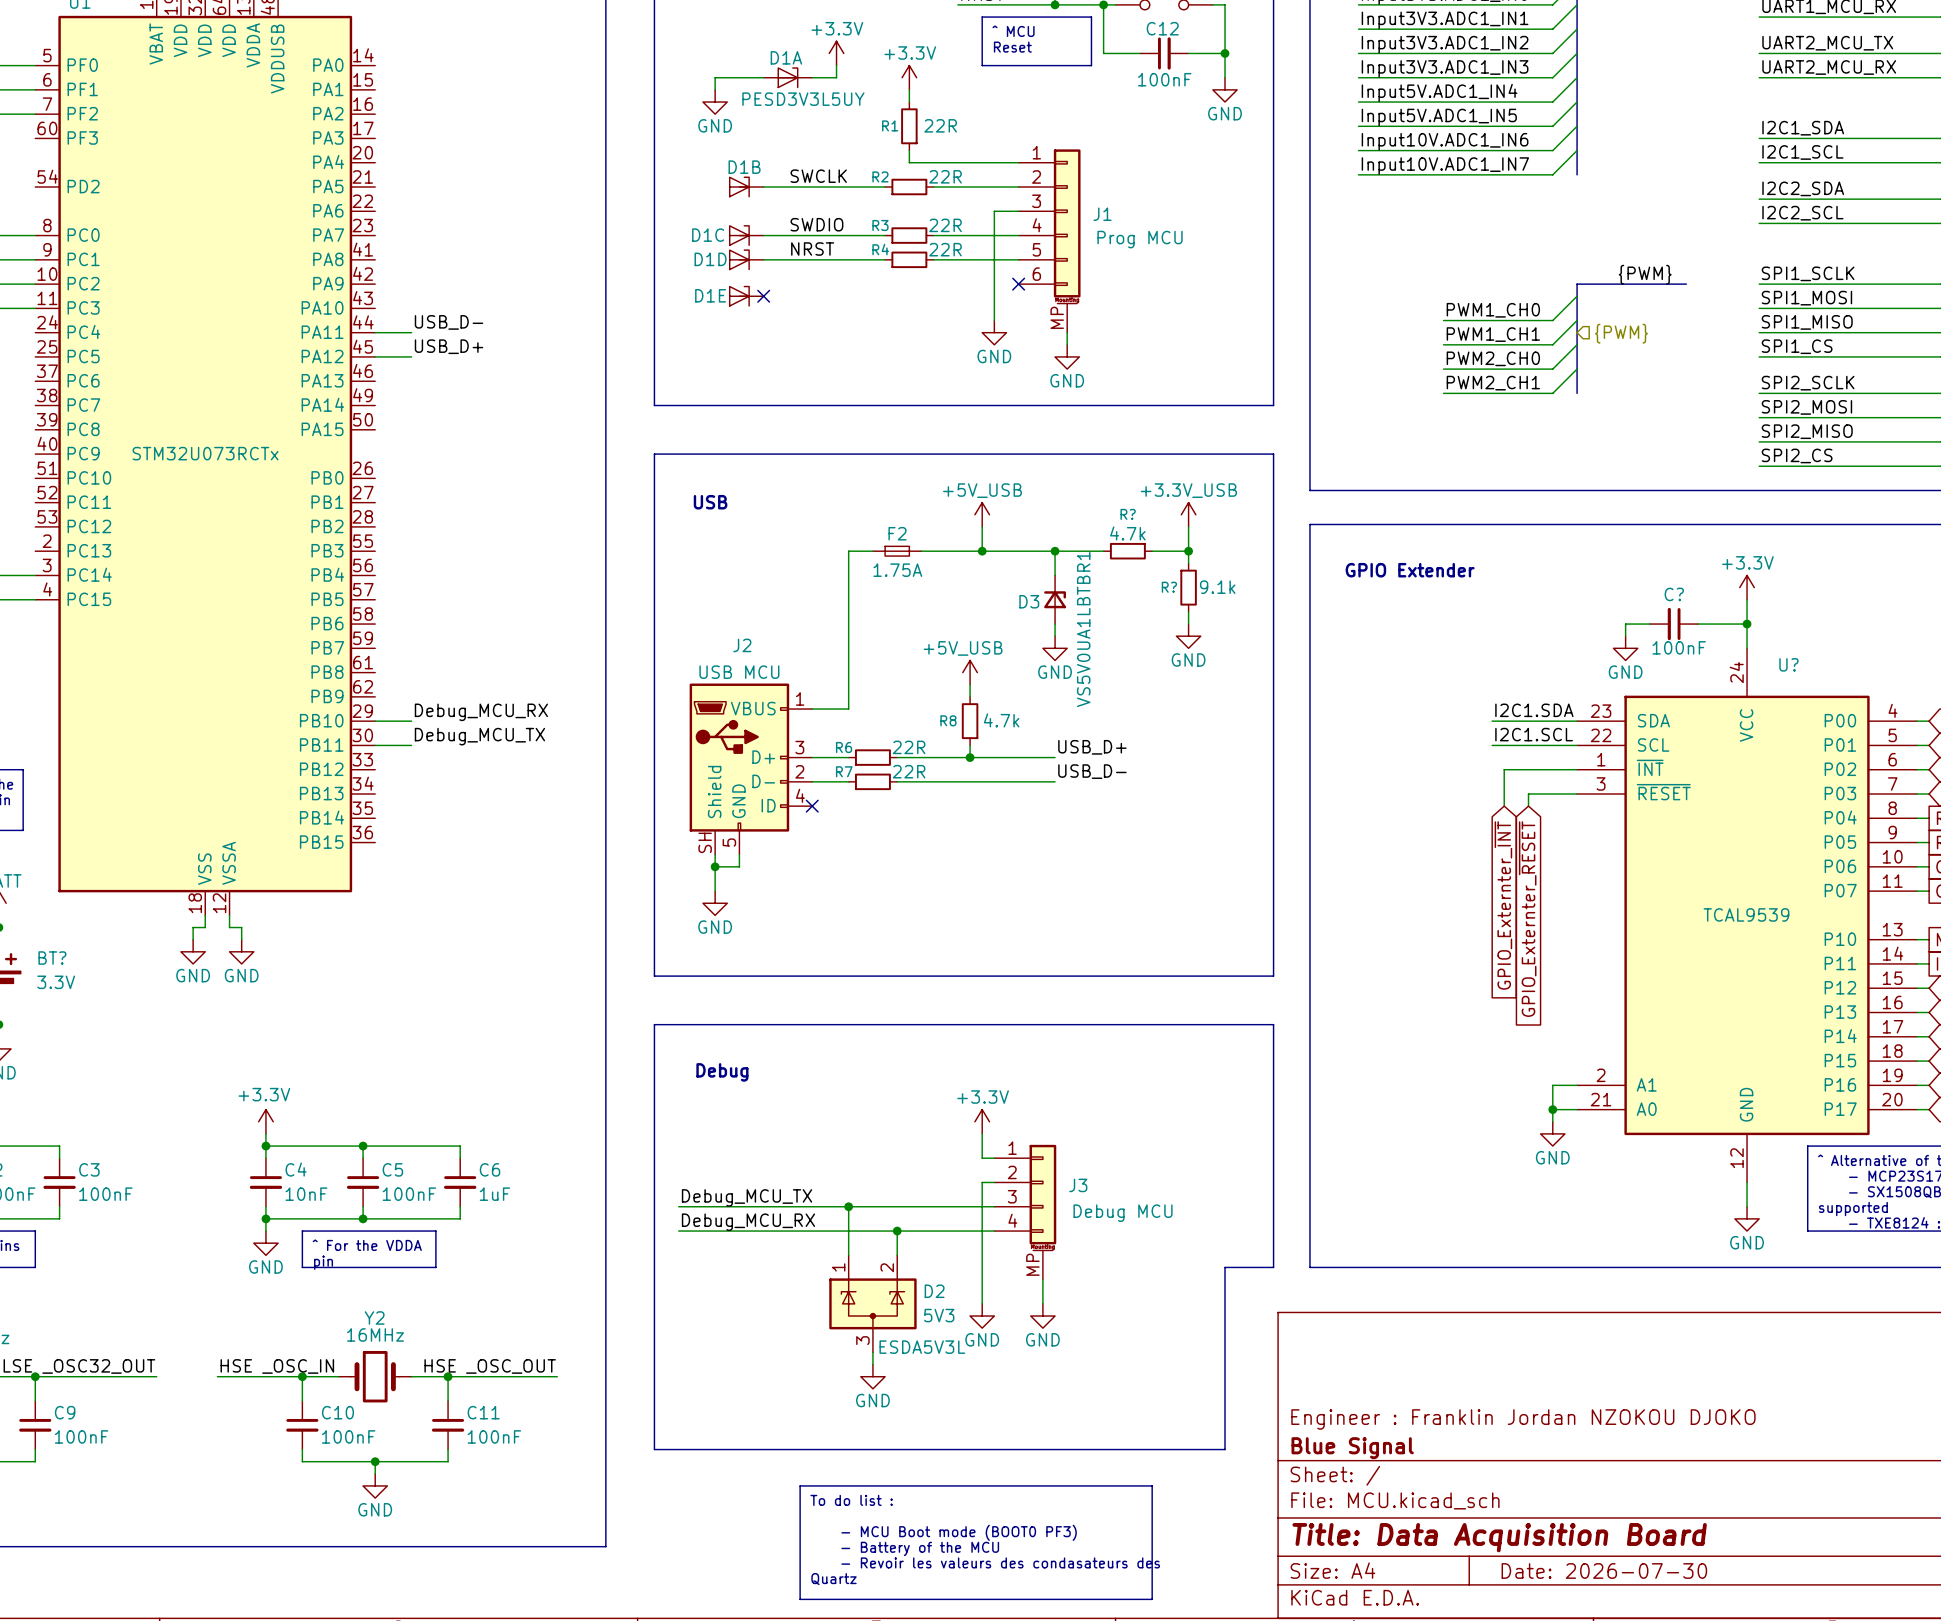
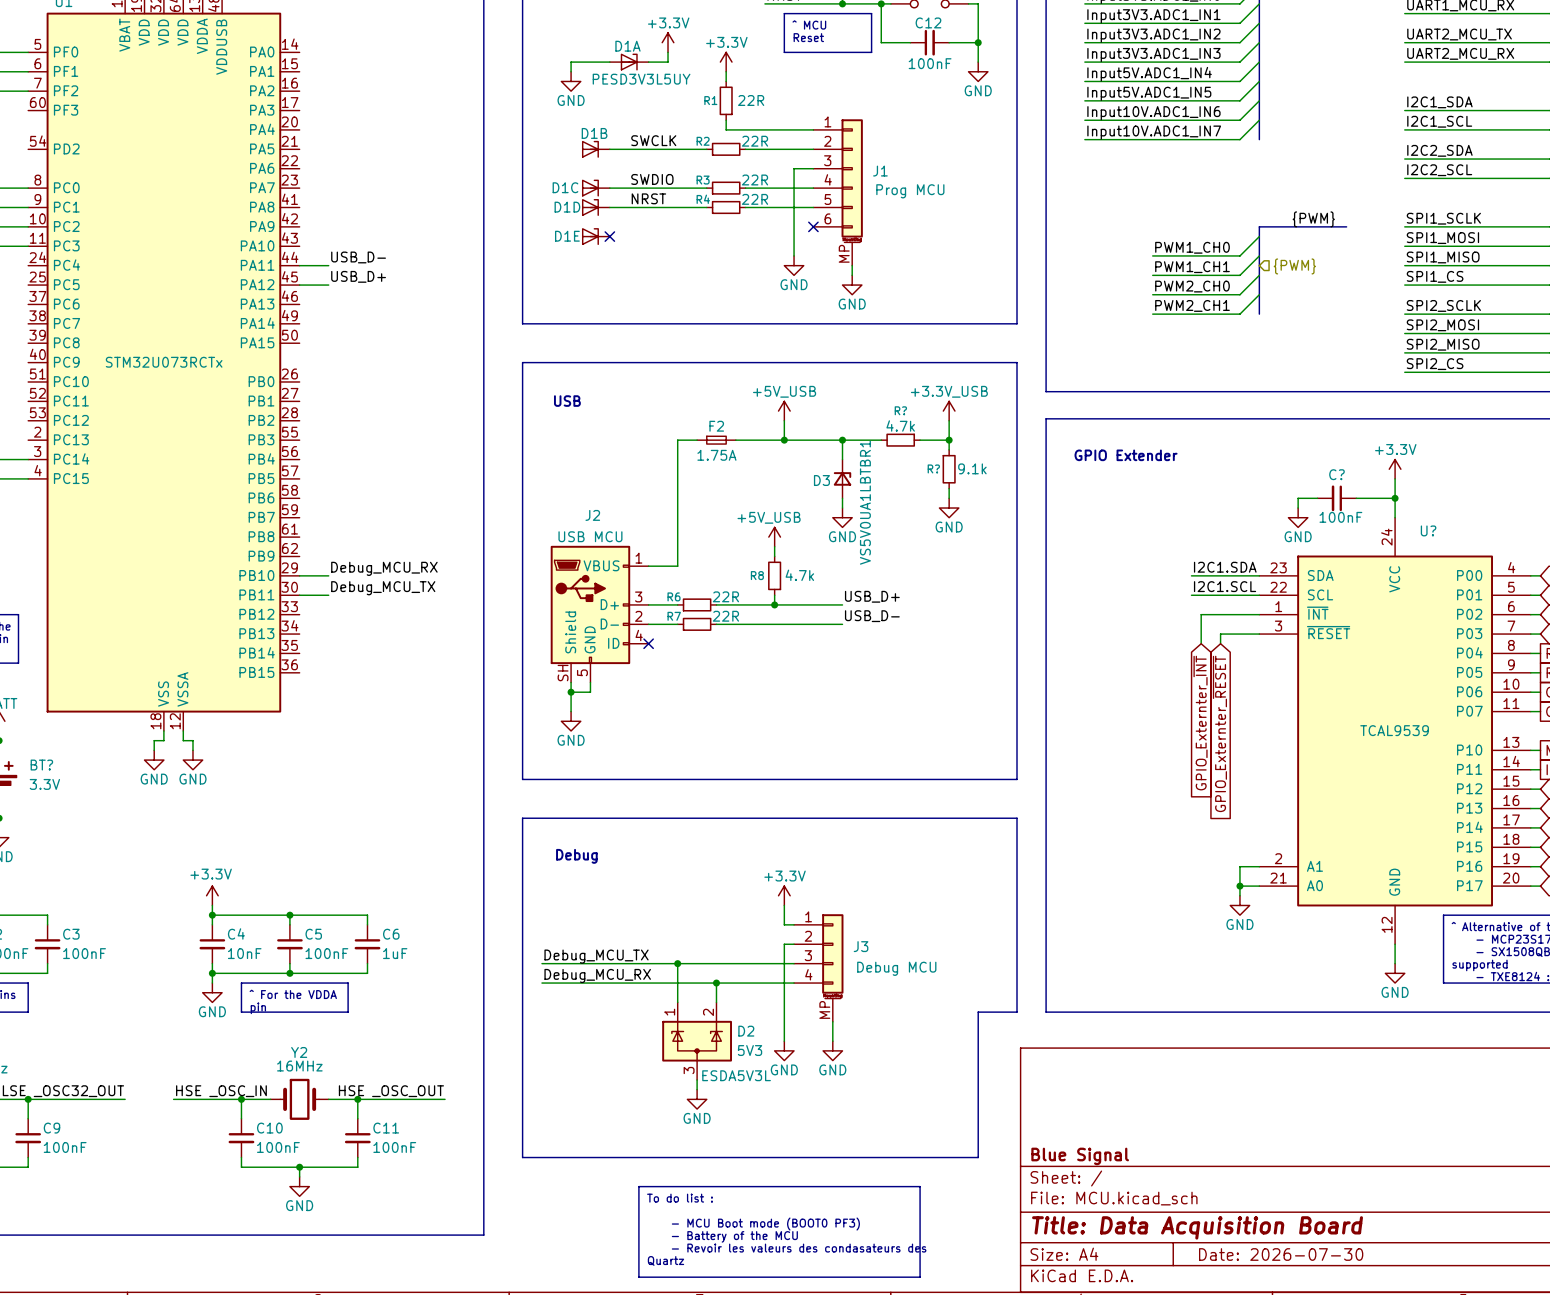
title block: Engineer : Franklin Jordan NZOKOU DJOKO (1523, 1419) -> none

